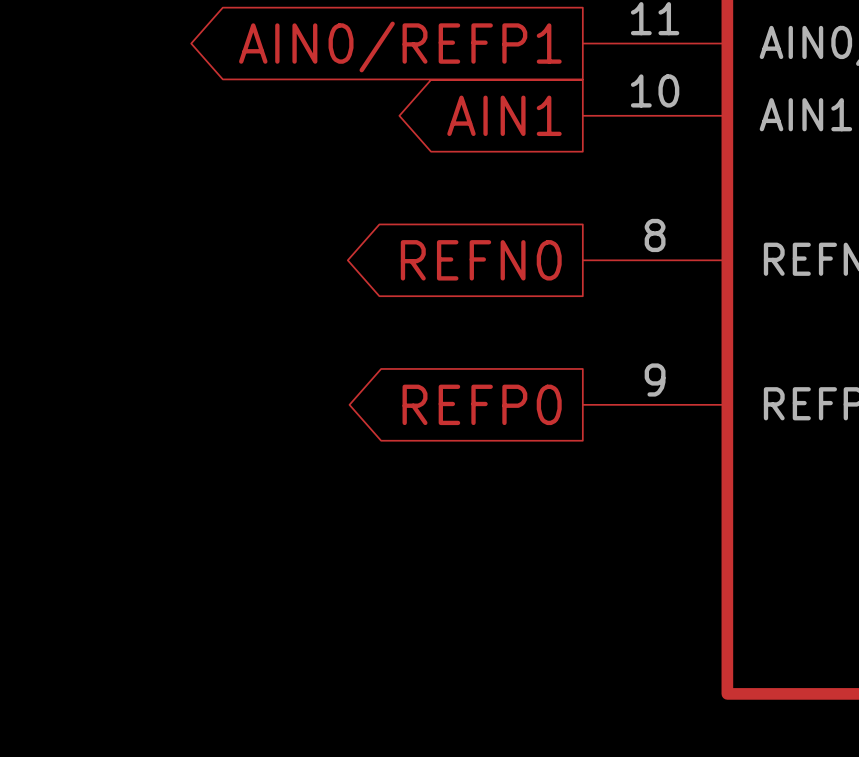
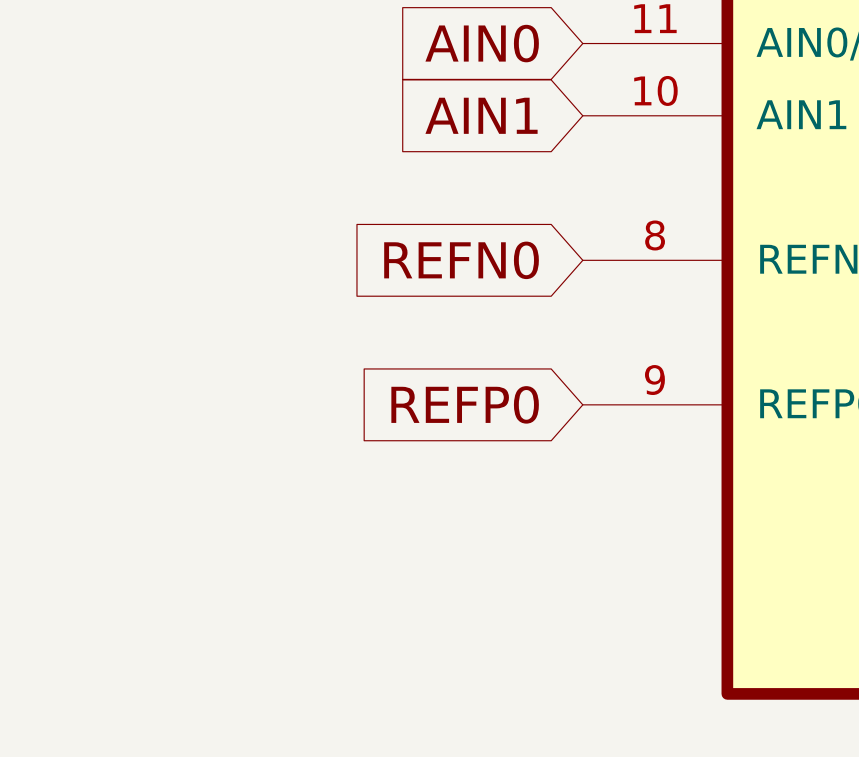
global label shape: output (400, 46) -> input (482, 43)
global label: AIN0/REFP1 (400, 46) -> AIN0 (482, 43)
global label shape: output (504, 115) -> input (481, 115)
global label shape: output (481, 260) -> input (461, 260)
global label shape: output (482, 404) -> input (465, 404)

